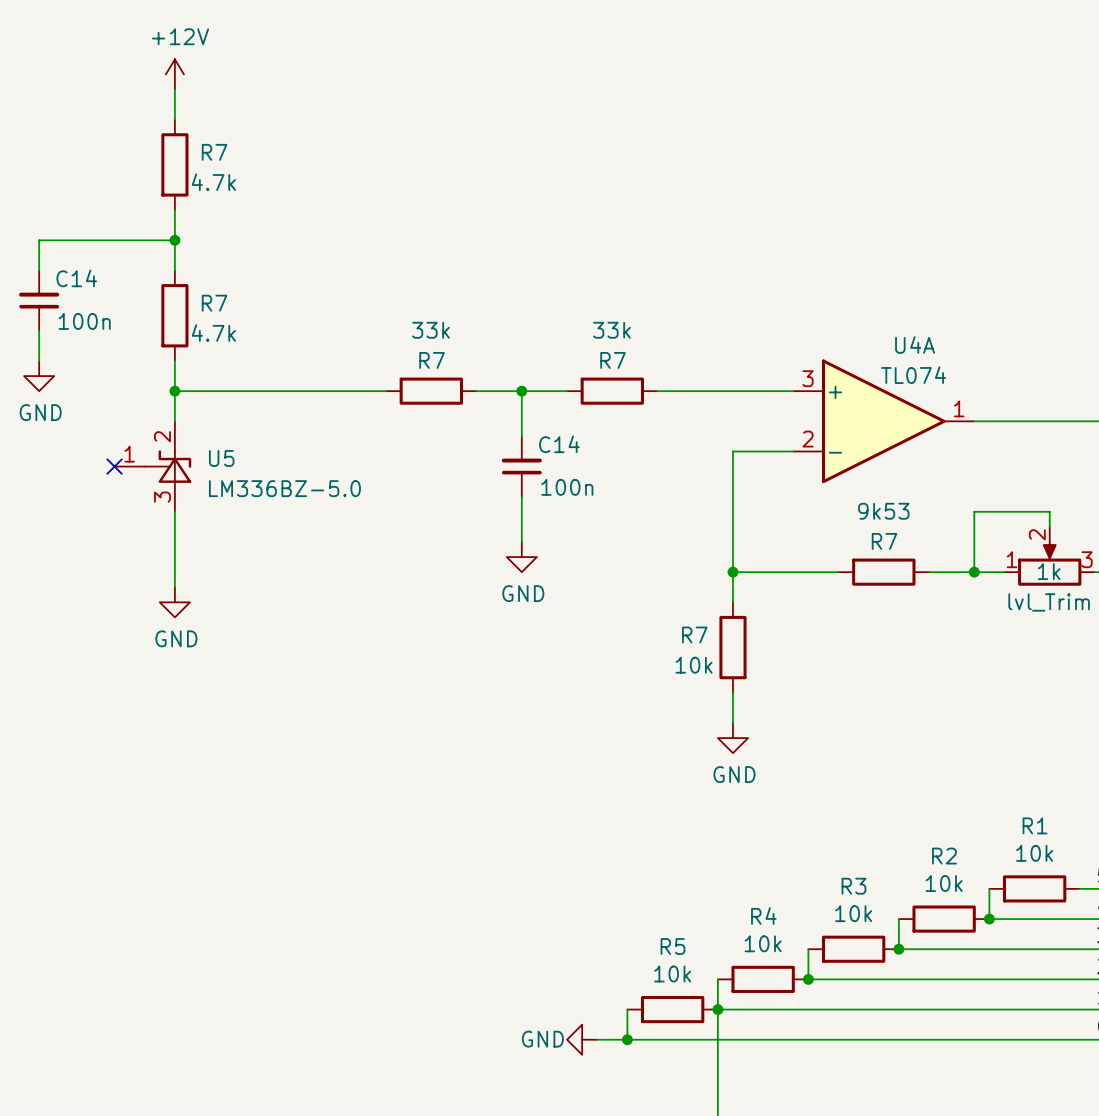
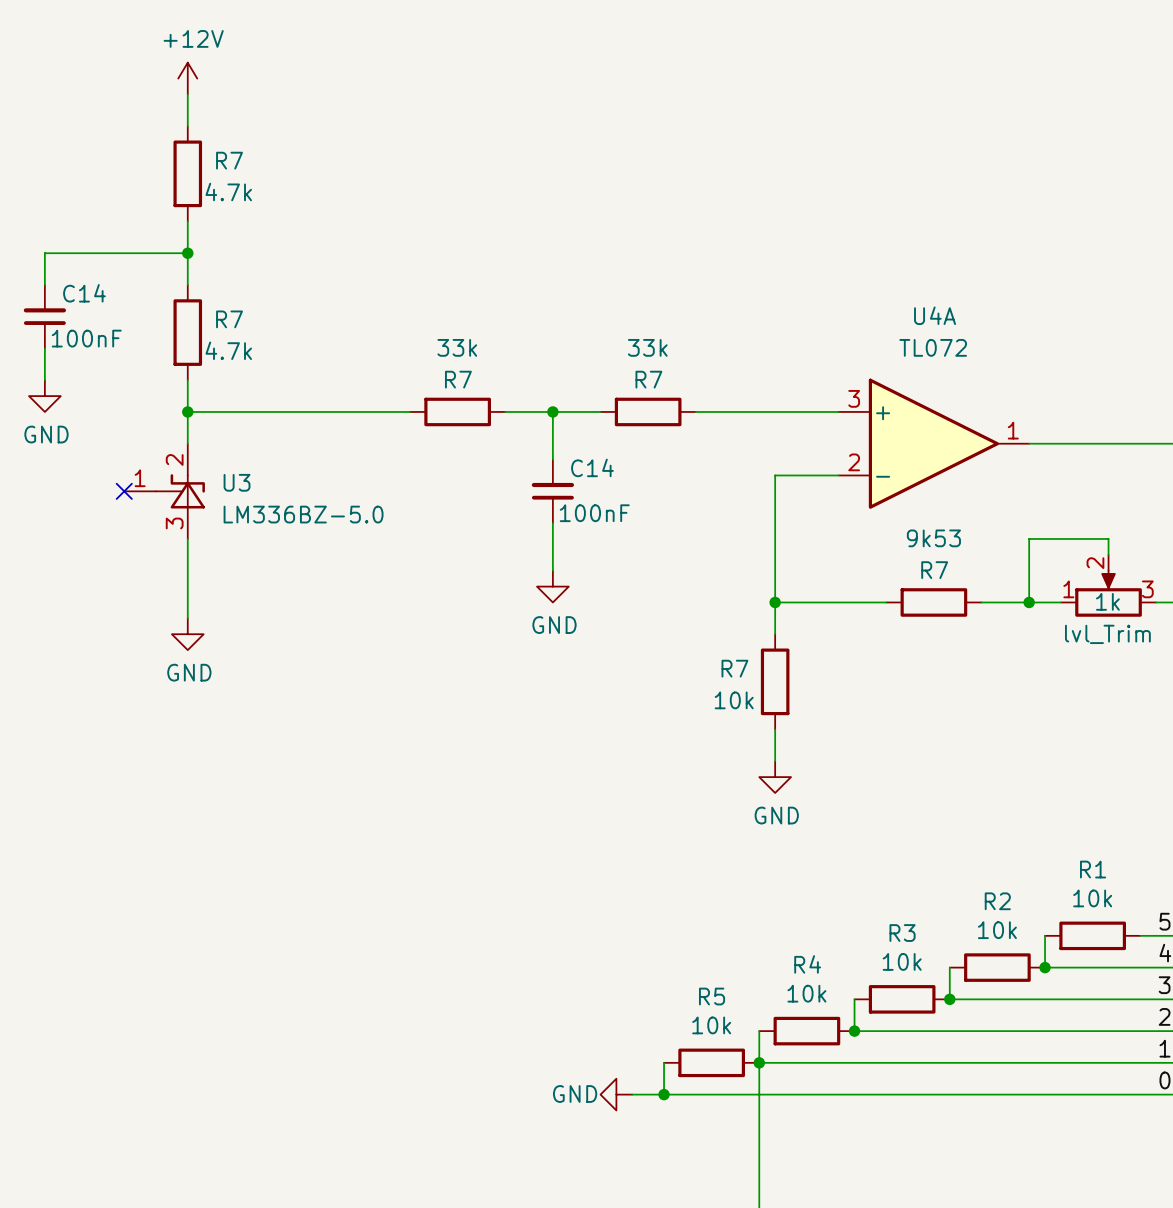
C14 value: 100n (84, 321) -> 100nF (86, 338)
U4A name position: U4A (915, 344) -> U4A (935, 315)
U4A value: TL074 (913, 375) -> TL072 (933, 347)
U5 name: U5 (221, 458) -> U3 (237, 482)
C14 value: 100n (567, 487) -> 100nF (594, 513)

